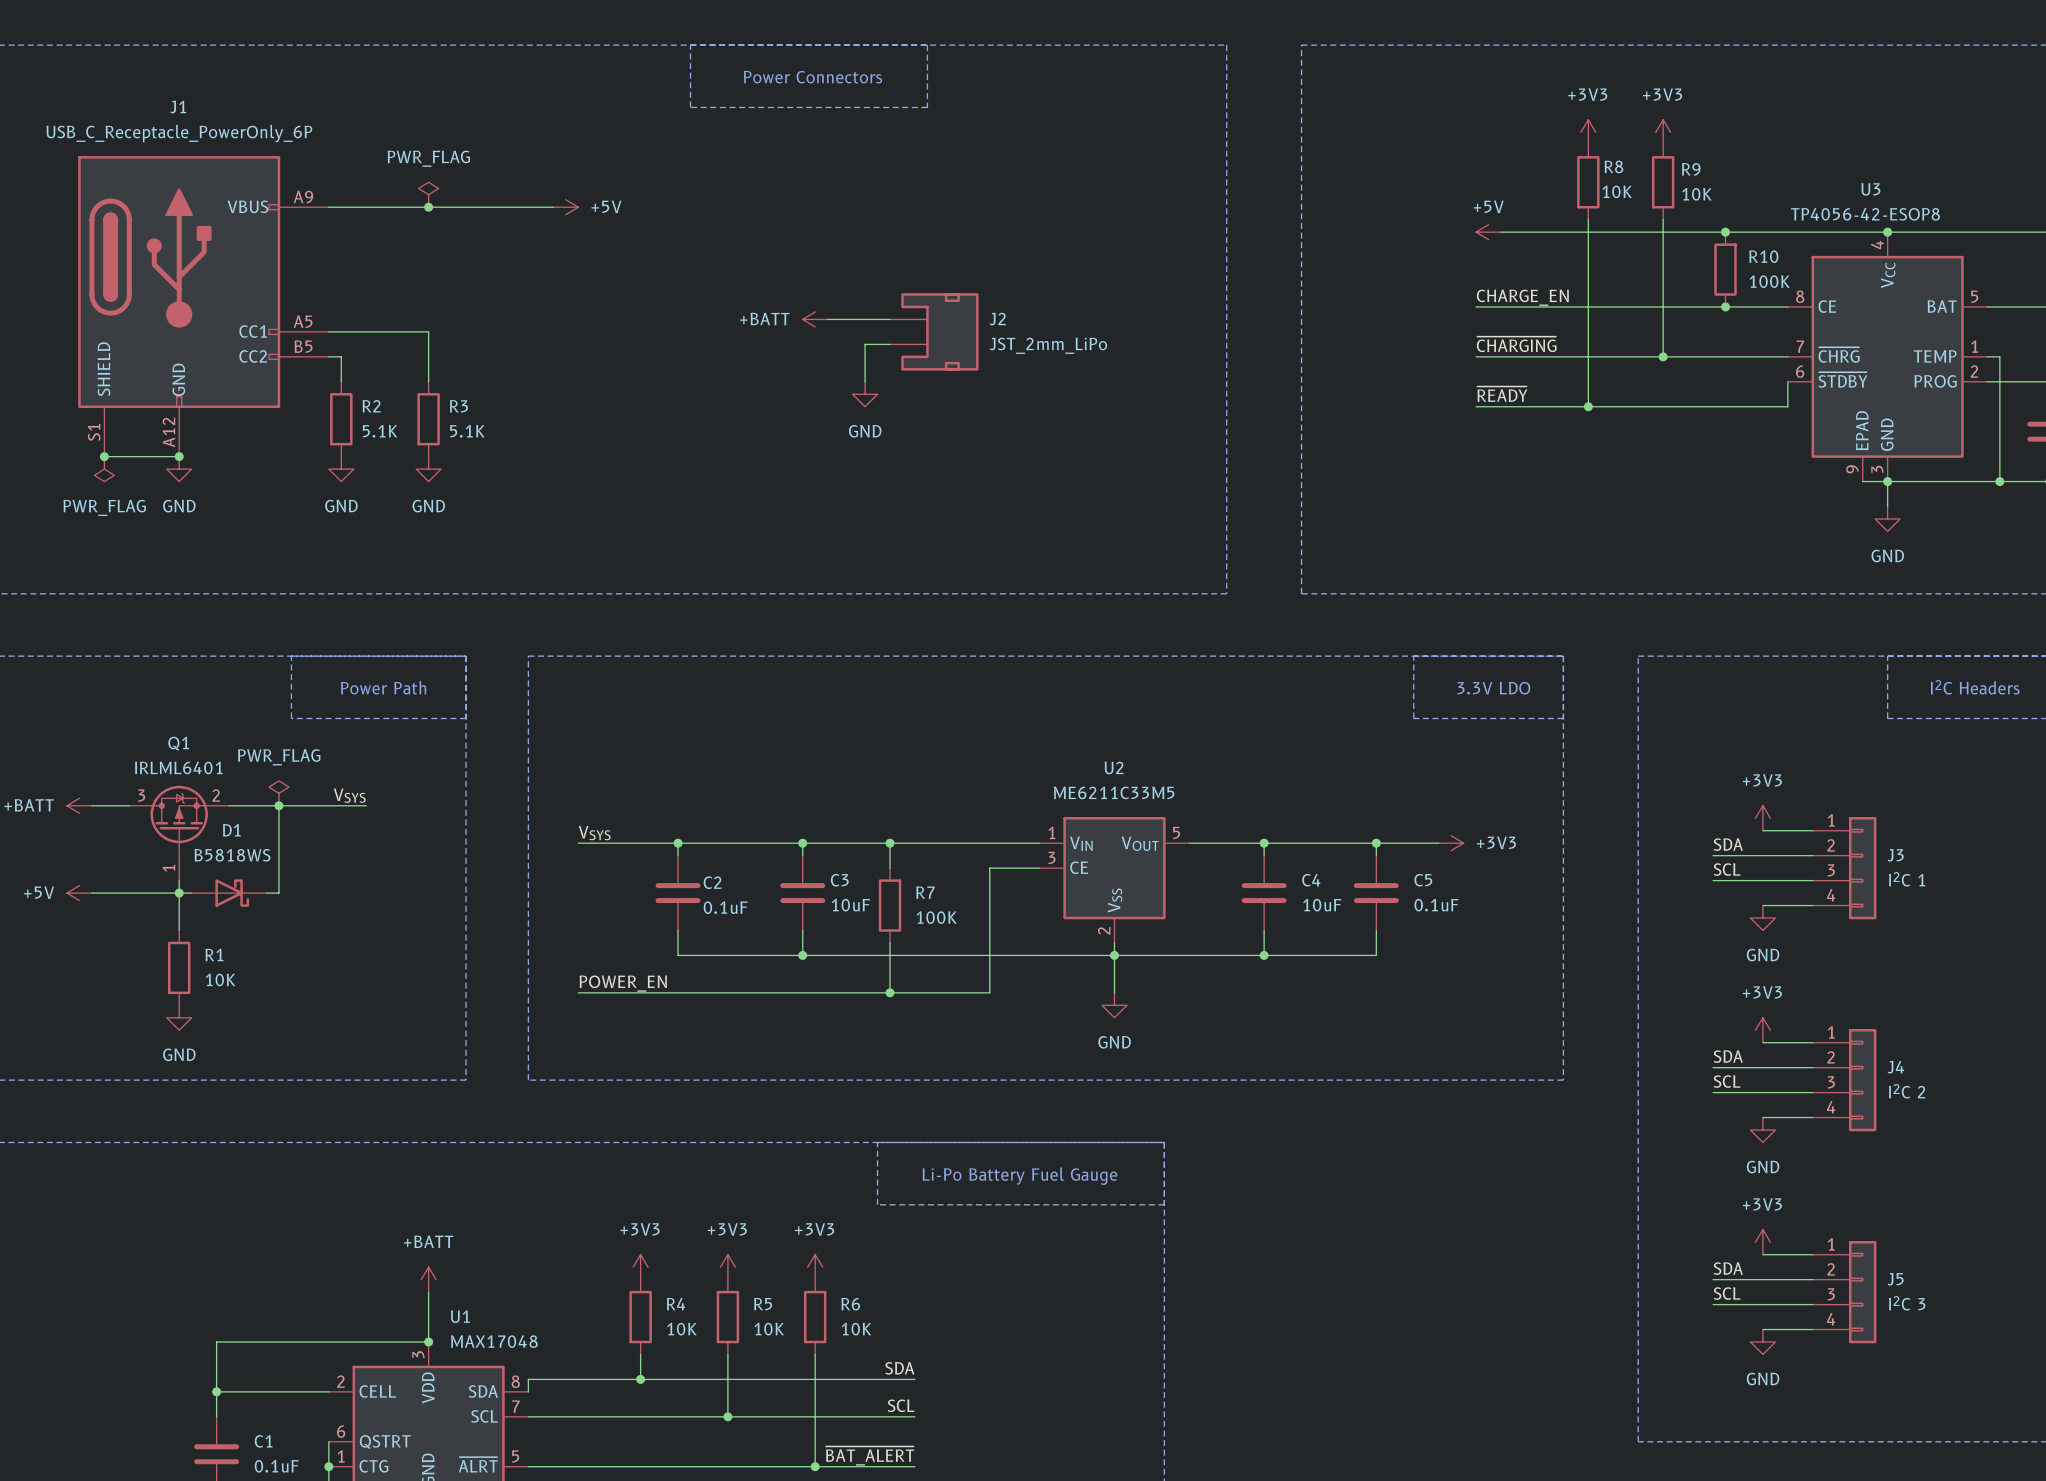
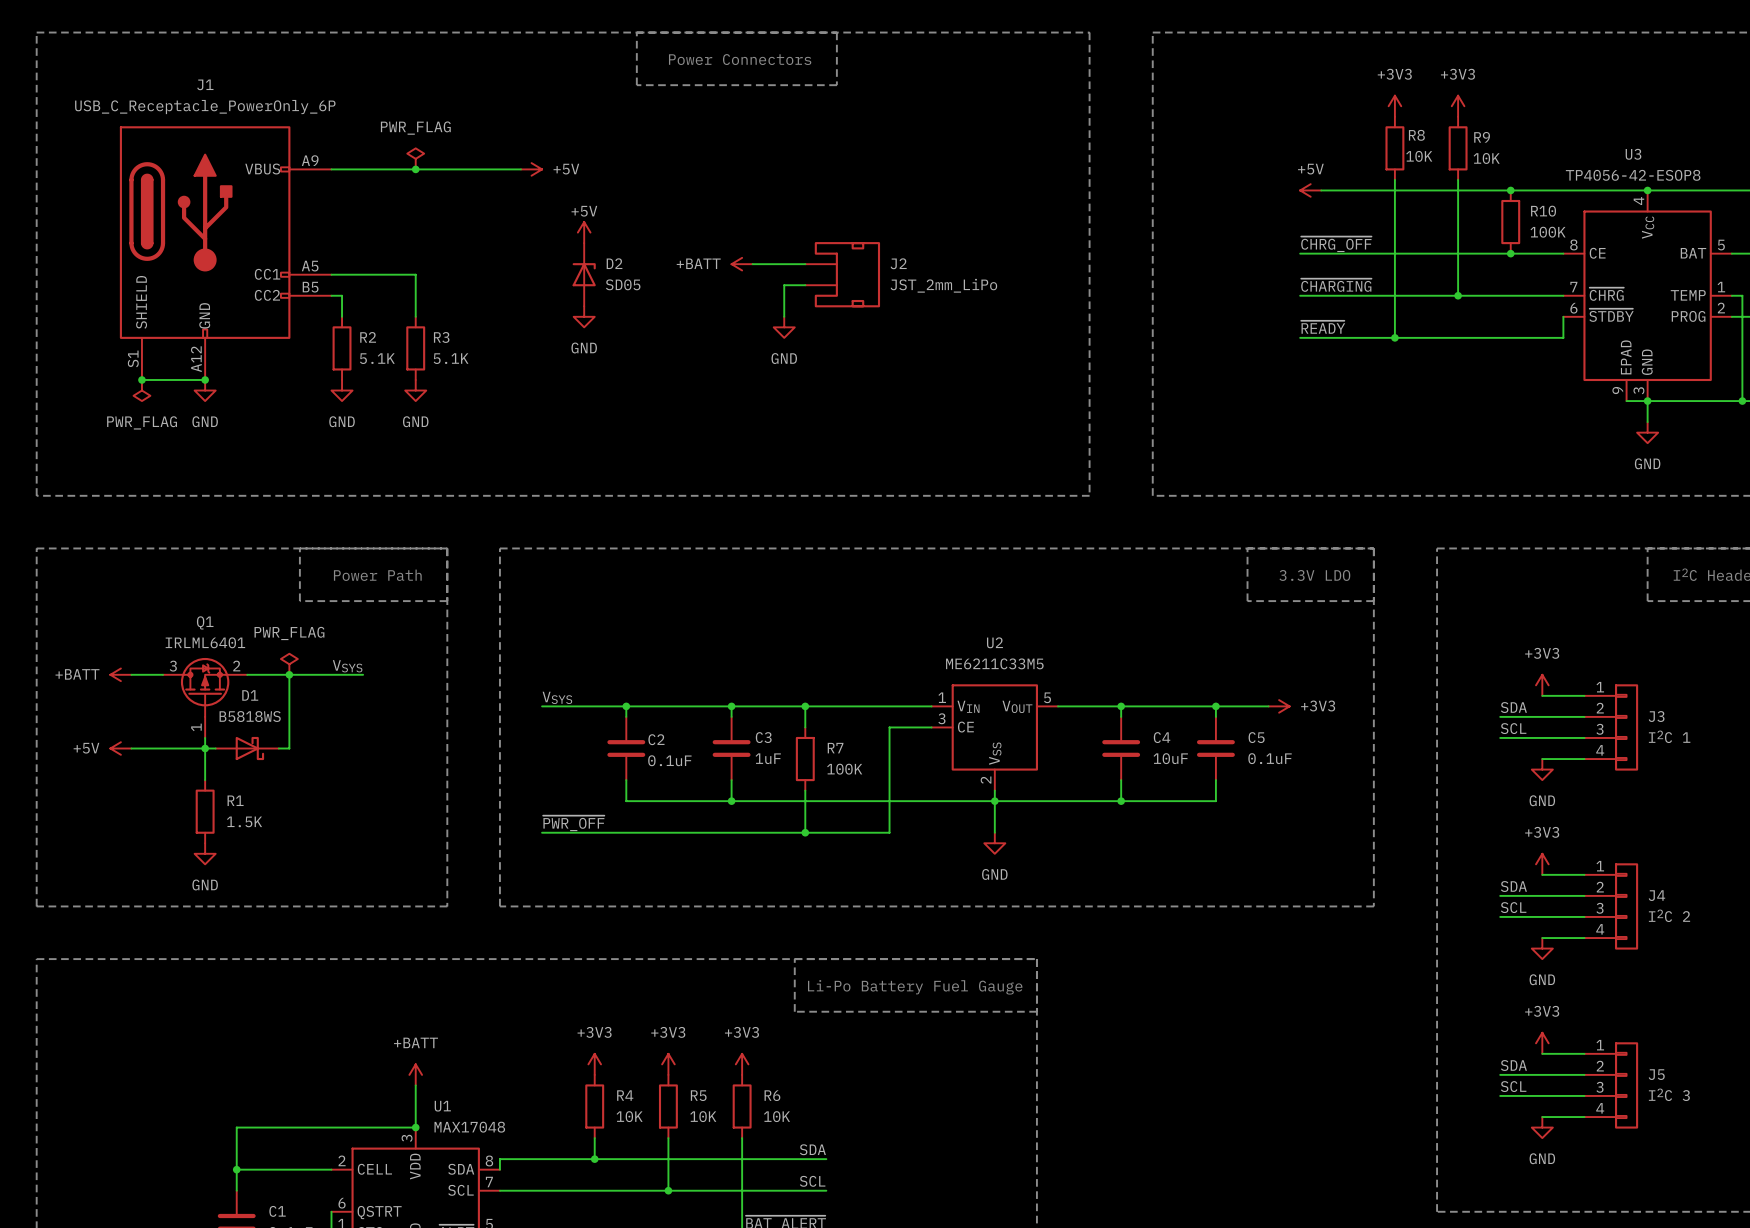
power symbol: none -> +5V (584, 232)
label: CHARGE_EN (1522, 297) -> ~{CHRG_OFF} (1336, 244)
D2: none -> SD05 (584, 274)
power symbol: none -> GND (584, 316)
C3 value: 10uF (850, 905) -> 1uF (768, 758)
R1 value: 10K (220, 979) -> 1.5K (244, 821)
label: POWER_EN (623, 983) -> ~{PWR_OFF} (573, 823)

